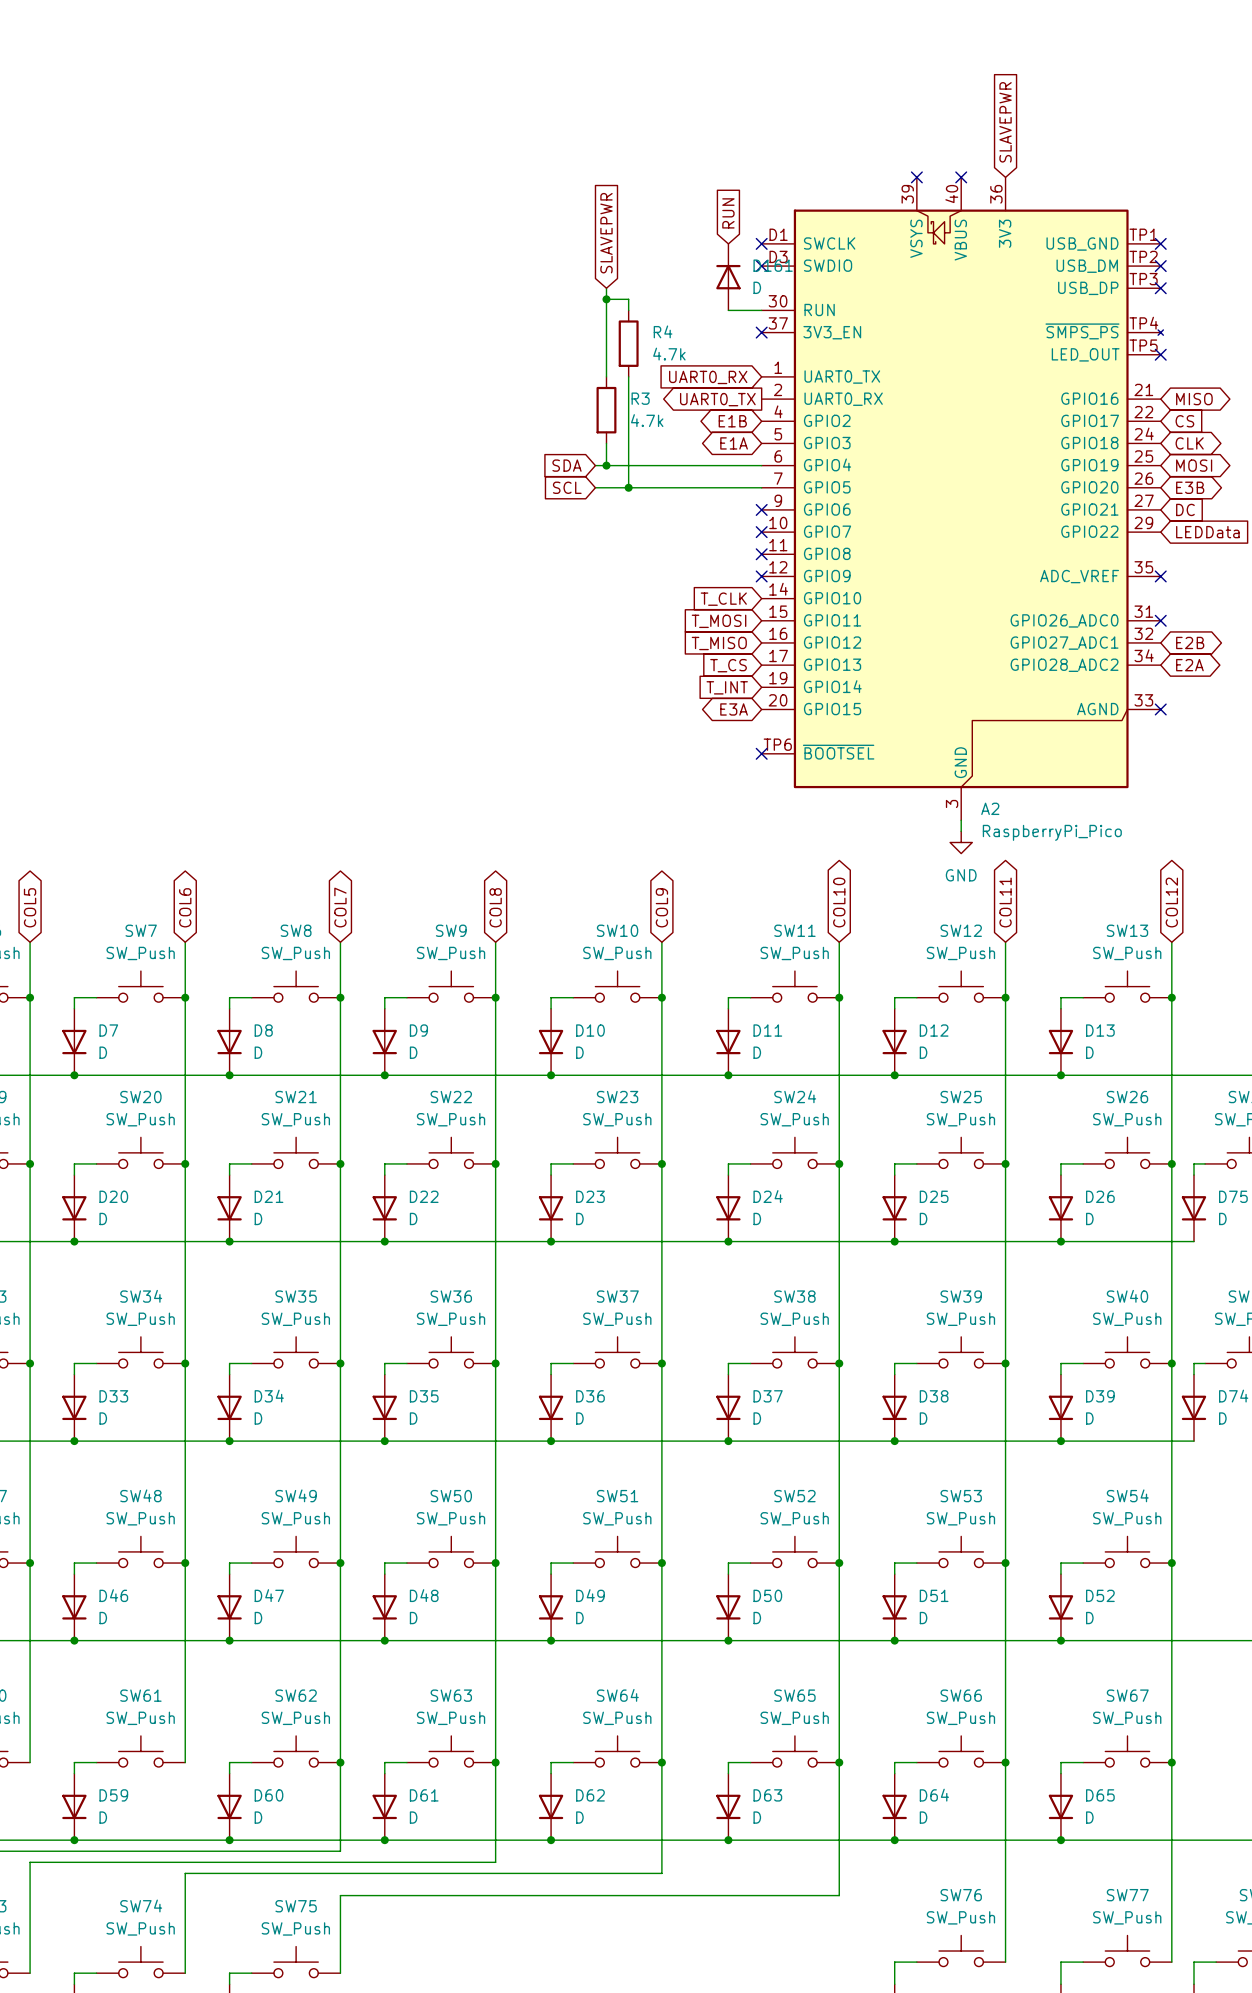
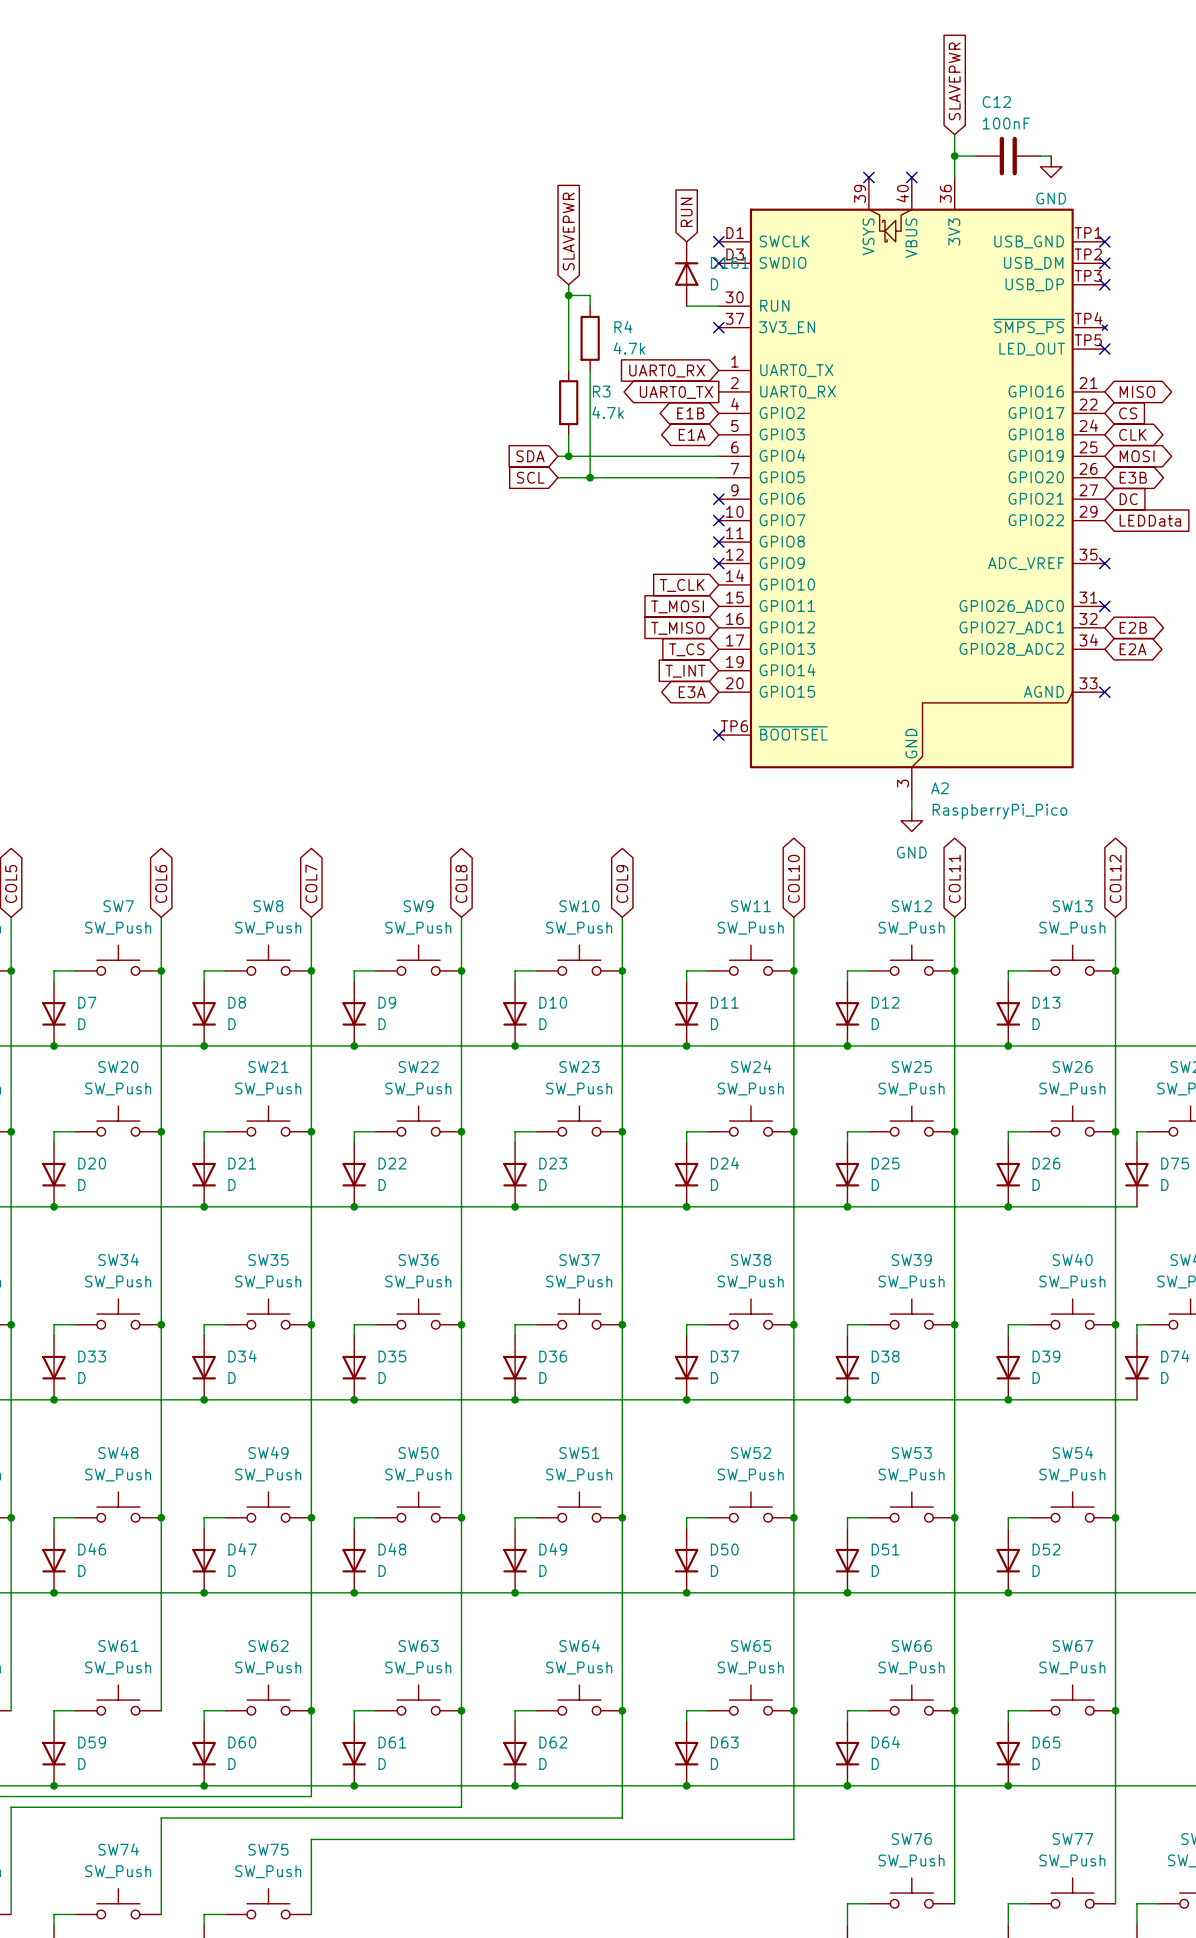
global label position: SLAVEPWR (1005, 122) -> SLAVEPWR (954, 81)
wire: none -> (954, 134) (954, 177)
wire: none -> (954, 156) (976, 156)
junction: none -> (954, 156)
C12: none -> 100nF (1008, 156)
wire: none -> (1040, 156) (1051, 156)
power symbol: none -> GND (1051, 166)

